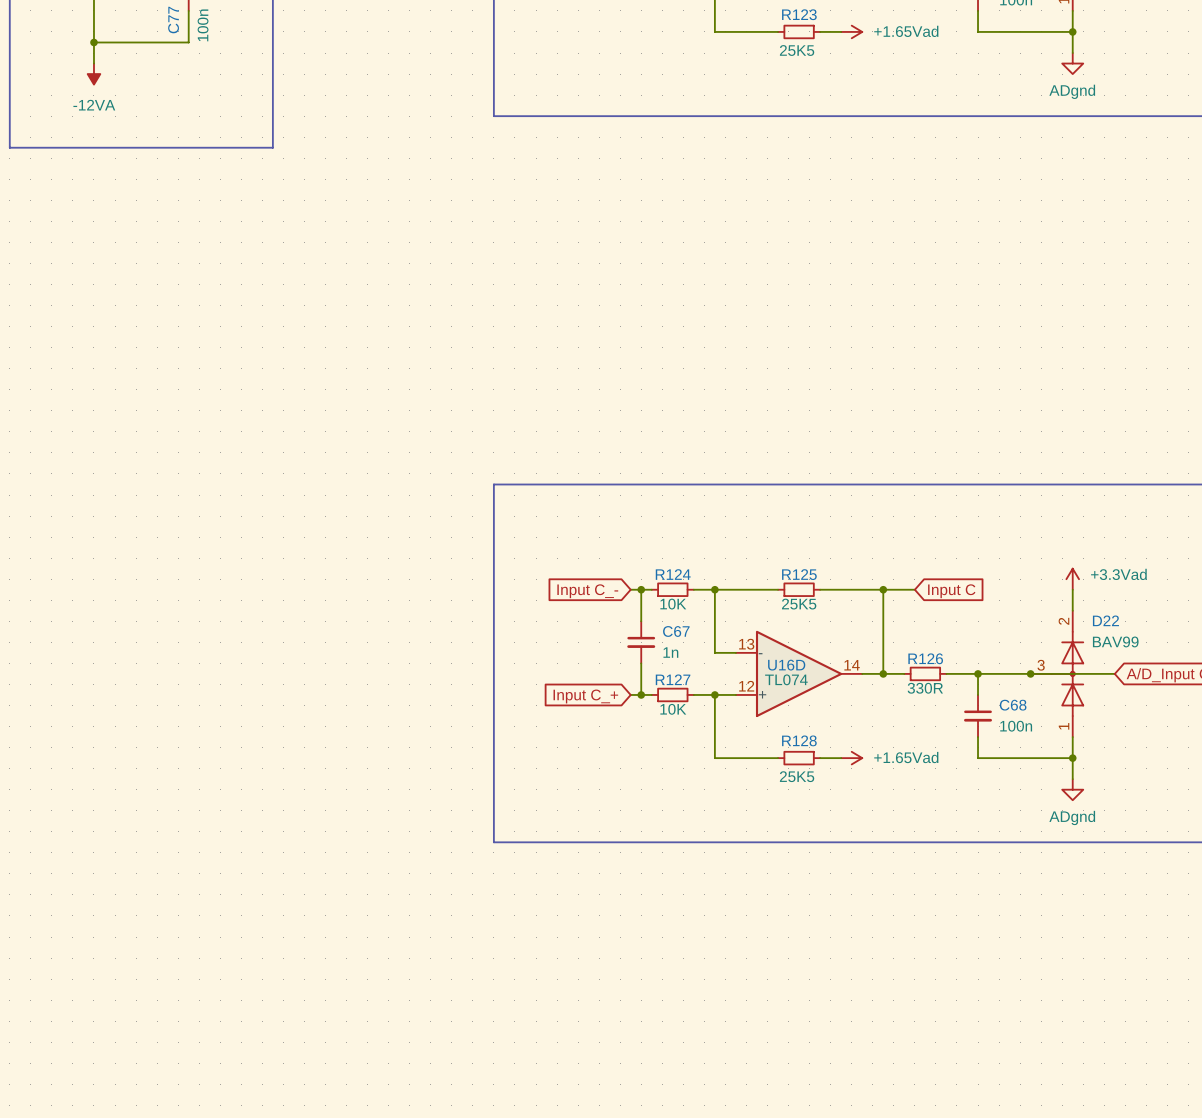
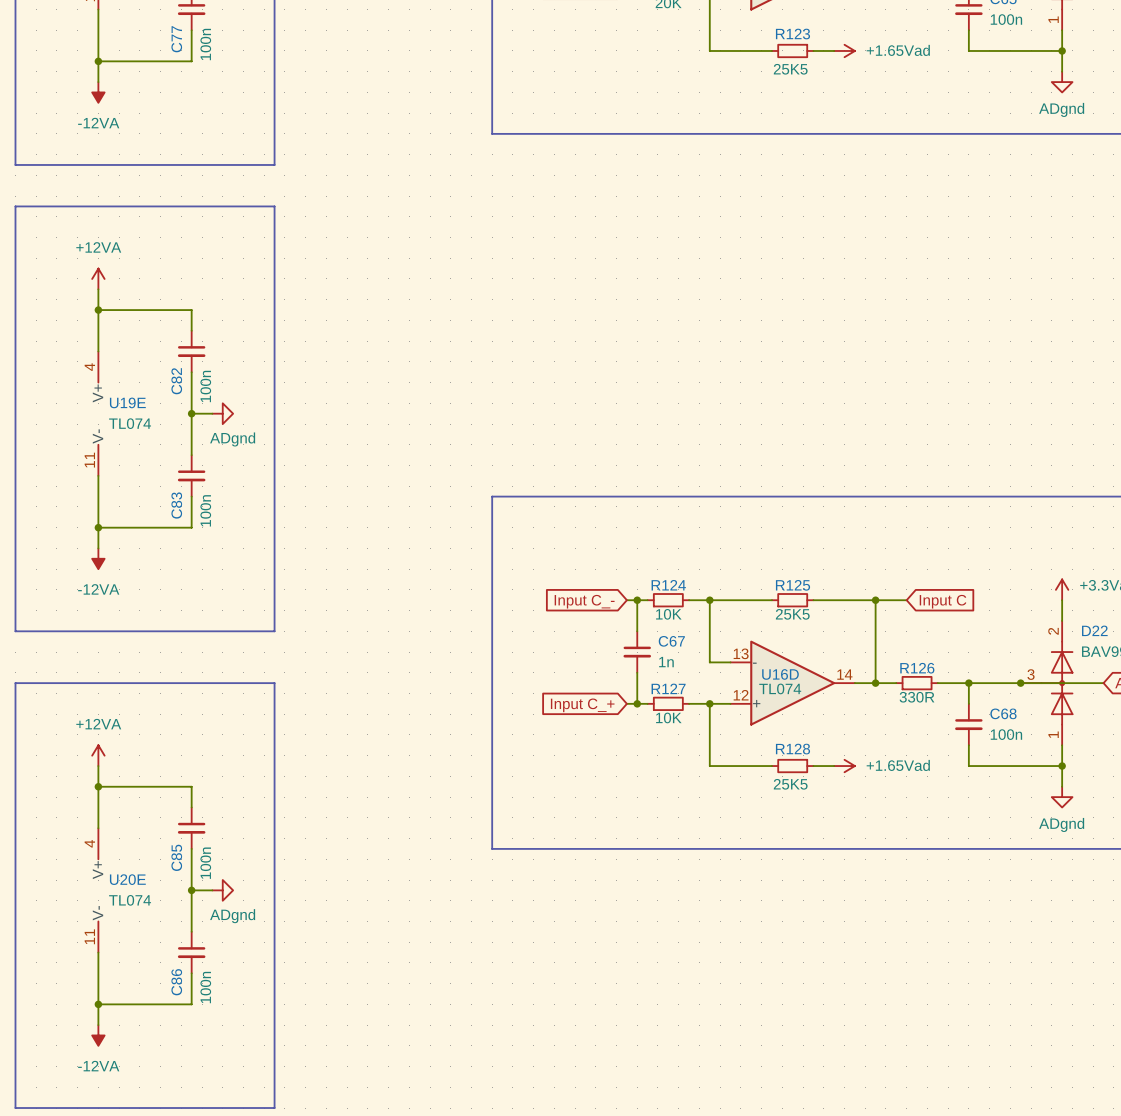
line: none -> (15, 206) (274, 206) (274, 631) (15, 631) (15, 206)
power symbol: none -> +12VA (98, 278)
wire: none -> (98, 289) (98, 351)
wire: none -> (98, 310) (191, 310) (191, 330)
junction: none -> (98, 310)
C82: none -> 100n (191, 351)
wire: none -> (191, 372) (191, 455)
U19E: none -> TL074 (98, 413)
wire: none -> (191, 413) (212, 413)
junction: none -> (191, 413)
power symbol: none -> ADgnd (222, 413)
wire: none -> (98, 475) (98, 548)
C83: none -> 100n (191, 475)
wire: none -> (191, 496) (191, 527) (98, 527)
junction: none -> (98, 527)
power symbol: none -> -12VA (98, 558)
line: none -> (15, 683) (15, 1108) (274, 1108) (274, 683) (15, 683)
power symbol: none -> +12VA (98, 755)
wire: none -> (98, 766) (98, 828)
wire: none -> (98, 786) (191, 786) (191, 807)
junction: none -> (98, 786)
C85: none -> 100n (191, 828)
wire: none -> (191, 848) (191, 931)
U20E: none -> TL074 (98, 890)
wire: none -> (191, 890) (212, 890)
junction: none -> (191, 890)
power symbol: none -> ADgnd (222, 890)
wire: none -> (98, 952) (98, 1025)
C86: none -> 100n (191, 952)
wire: none -> (191, 973) (191, 1004) (98, 1004)
junction: none -> (98, 1004)
power symbol: none -> -12VA (98, 1035)

